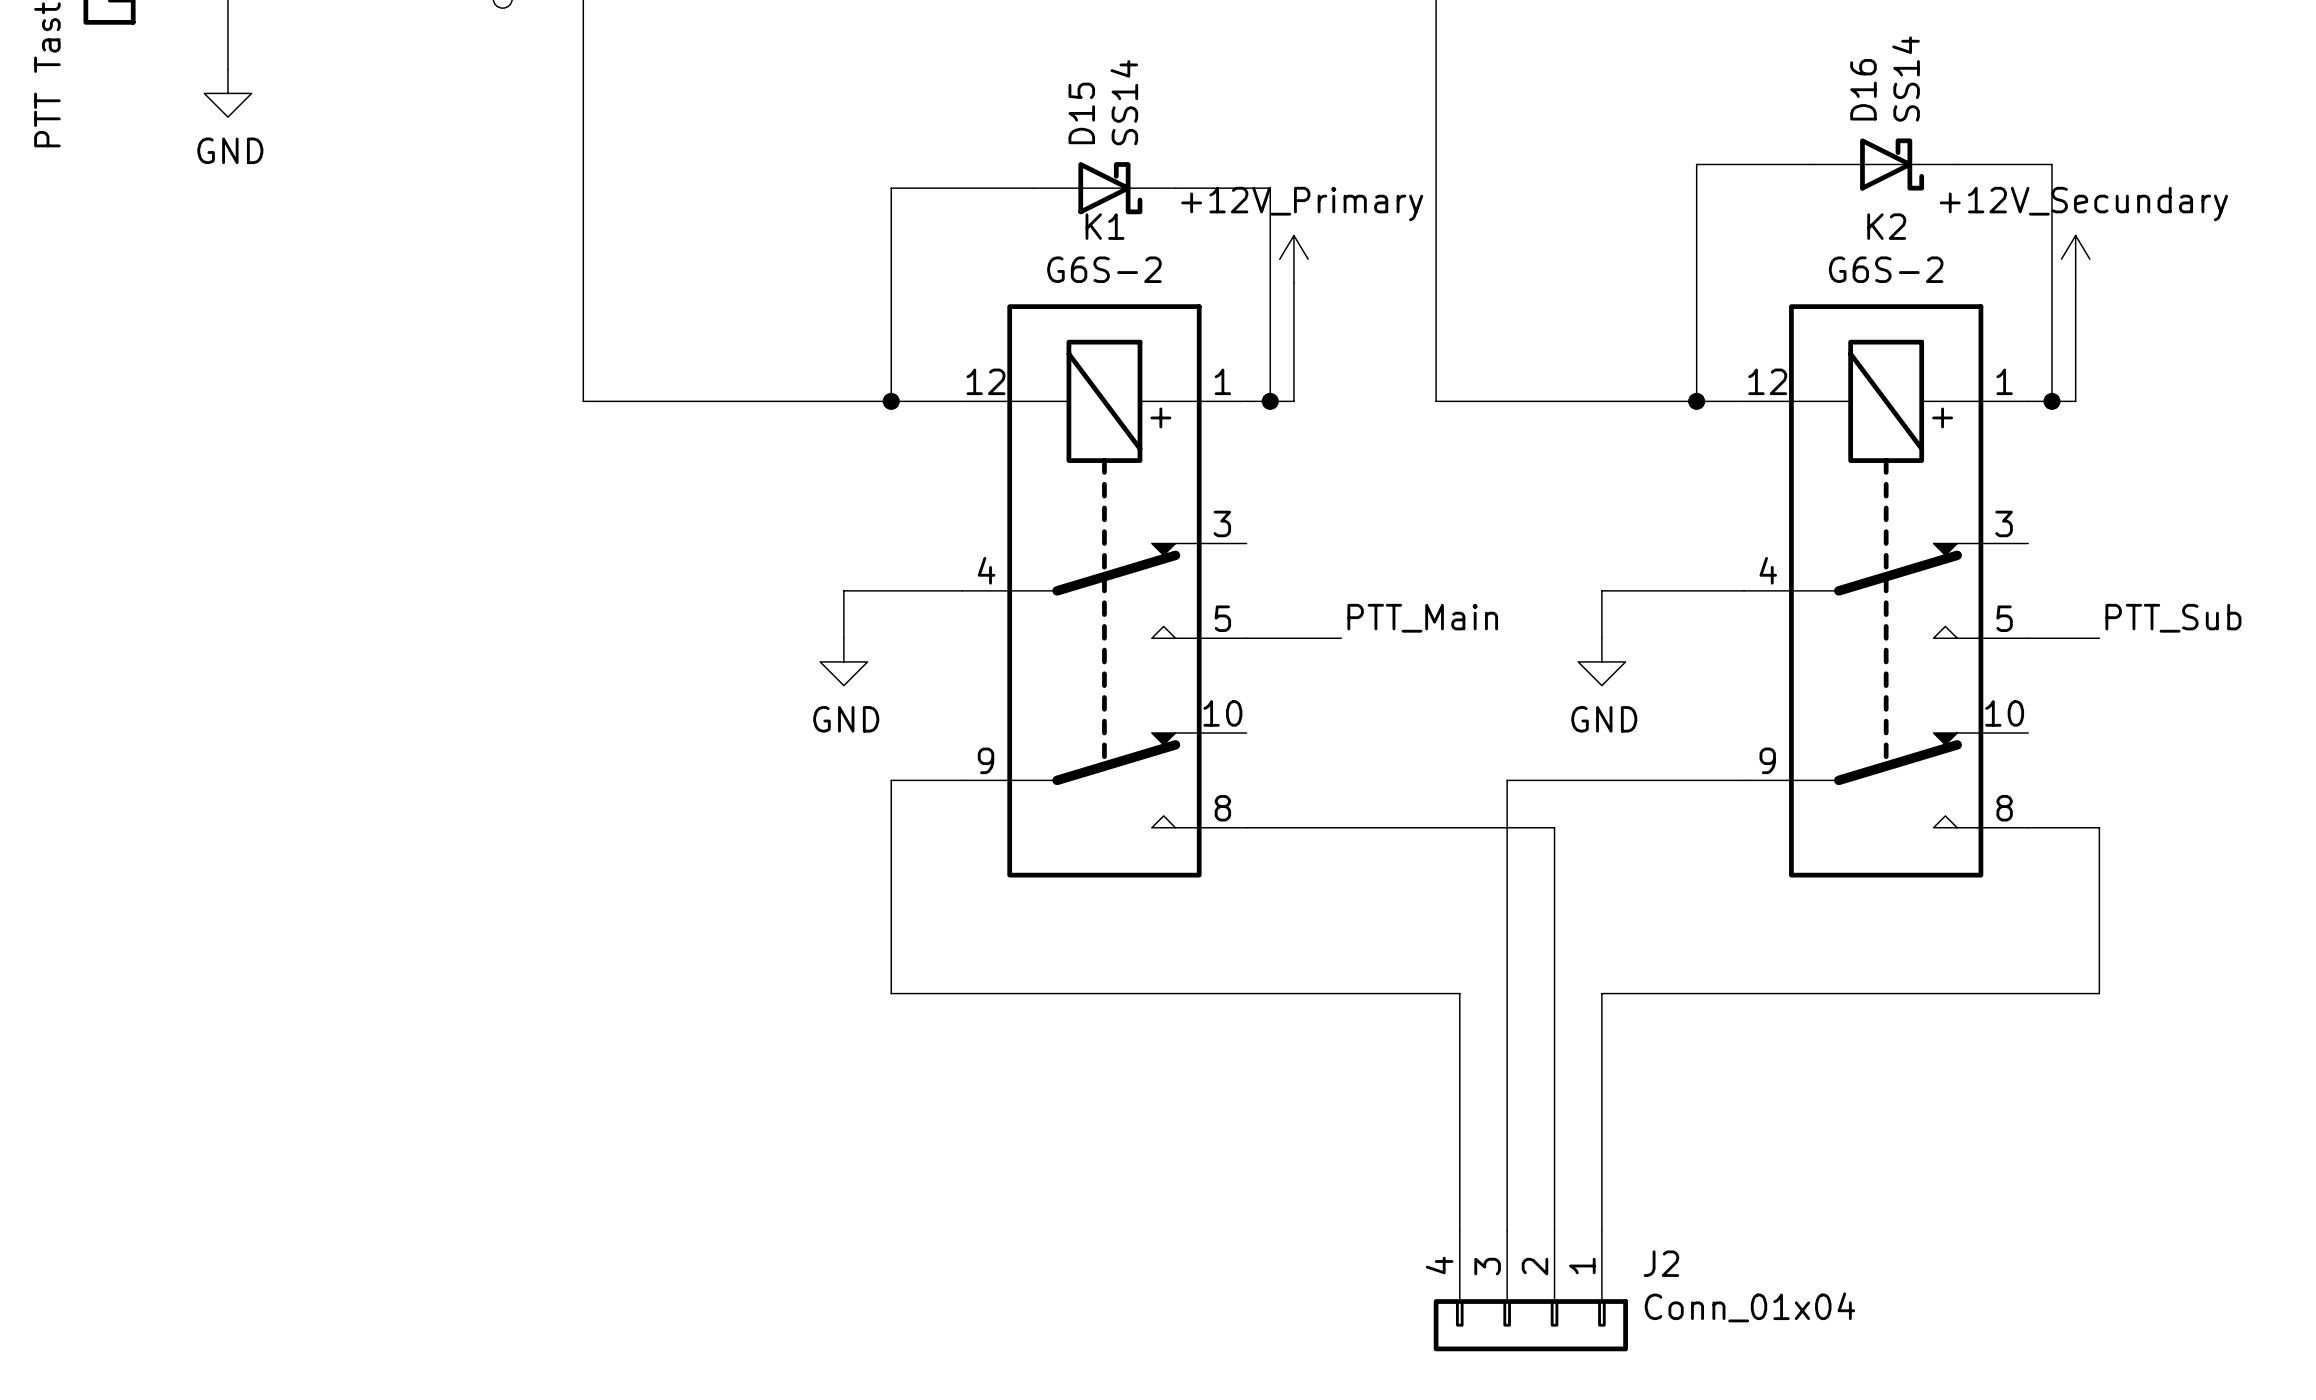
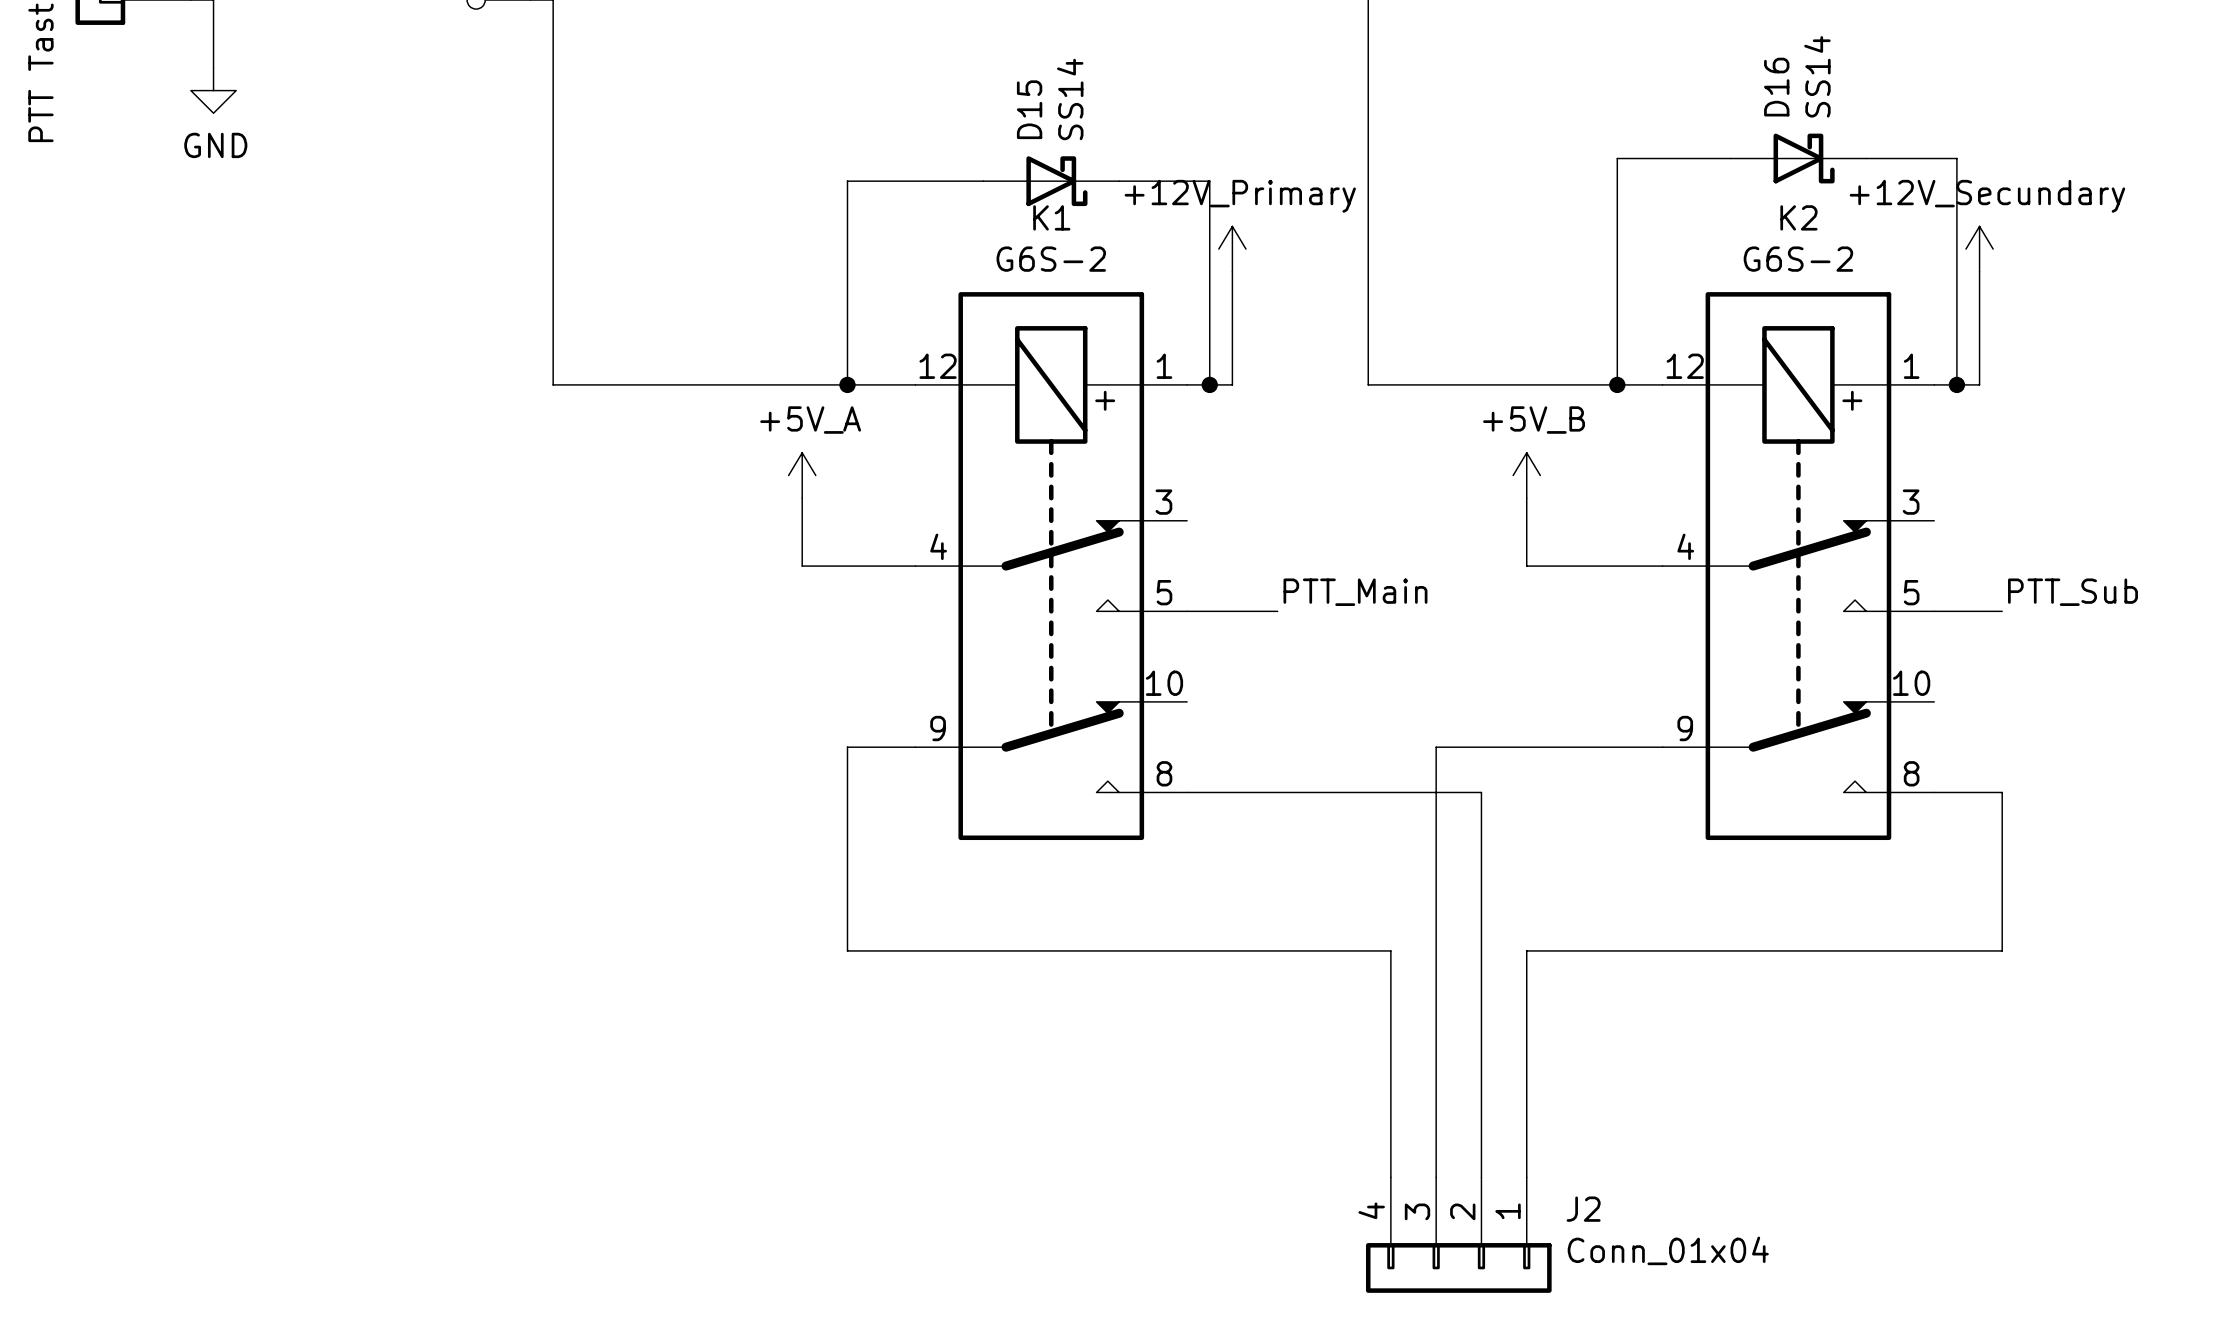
power symbol: none -> +5V_A (802, 475)
power symbol: none -> +5V_B (1526, 475)
wire: (843, 590) (843, 638) -> (802, 566) (802, 498)
wire: (1601, 590) (1601, 638) -> (1526, 566) (1526, 498)
power symbol: GND (843, 661) -> none
power symbol: GND (1601, 661) -> none

